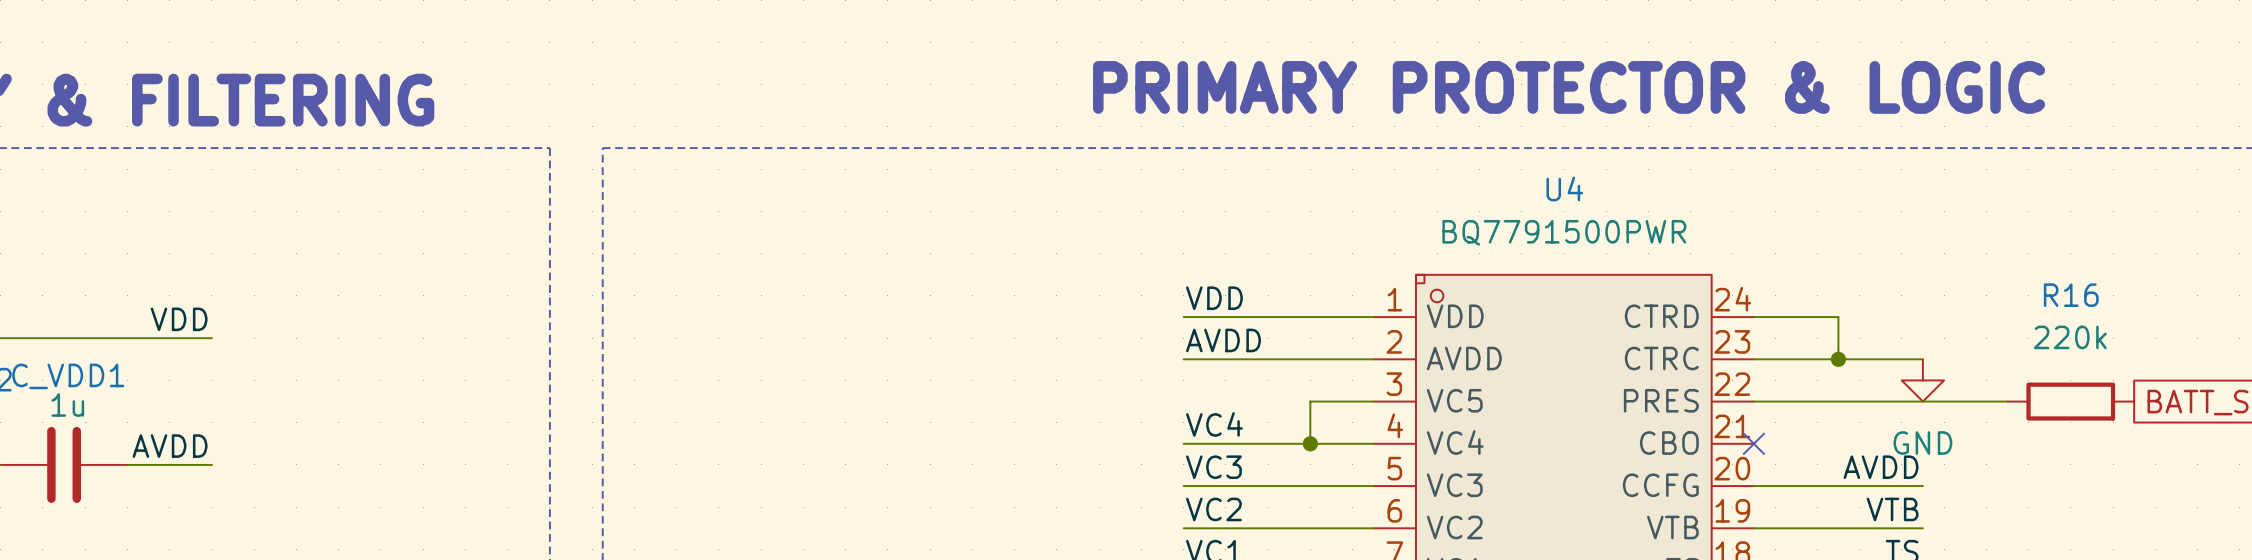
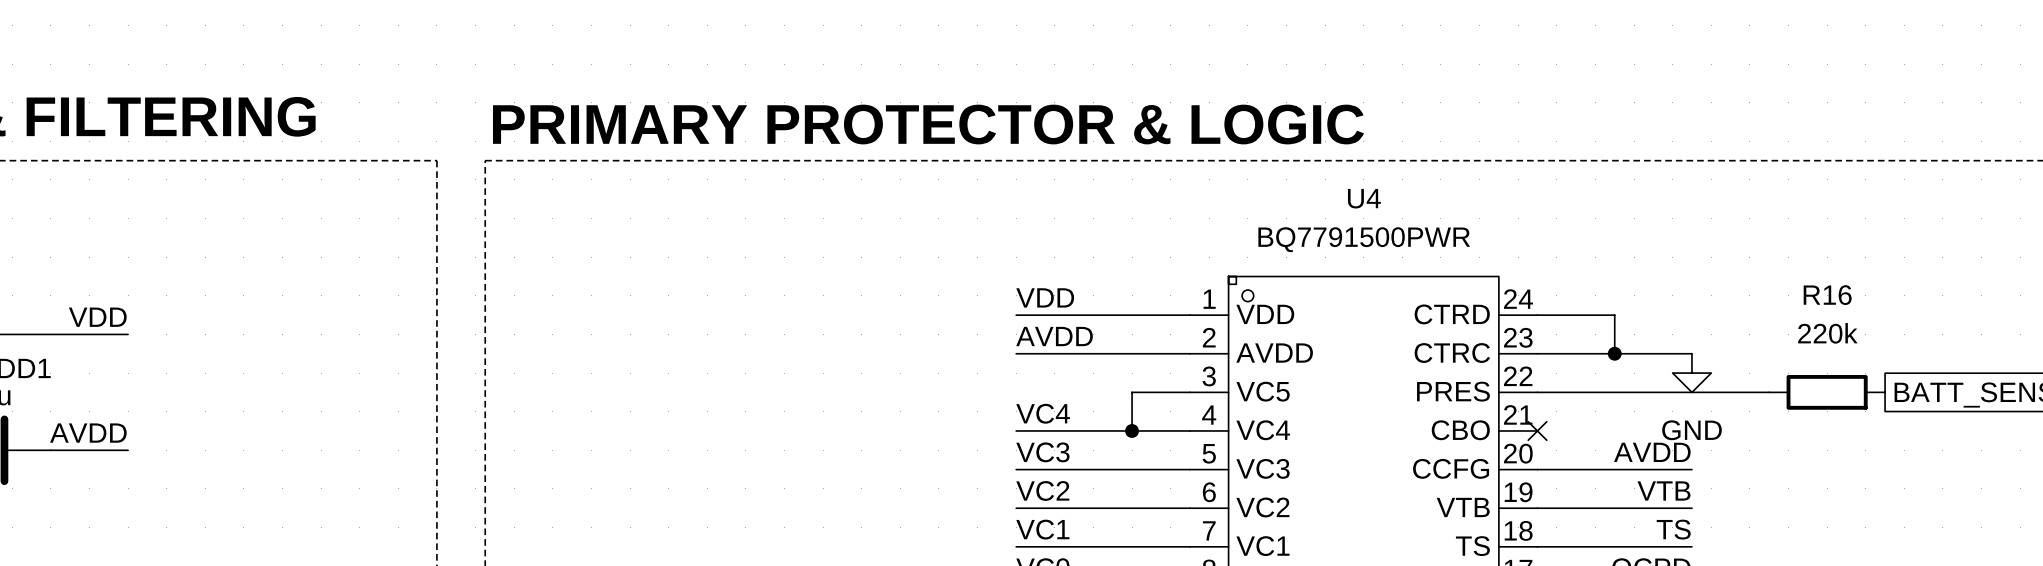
text: PRIMARY PROTECTOR & LOGIC (1569, 87) -> none
text: none -> PRIMARY PROTECTOR & LOGIC (928, 124)

